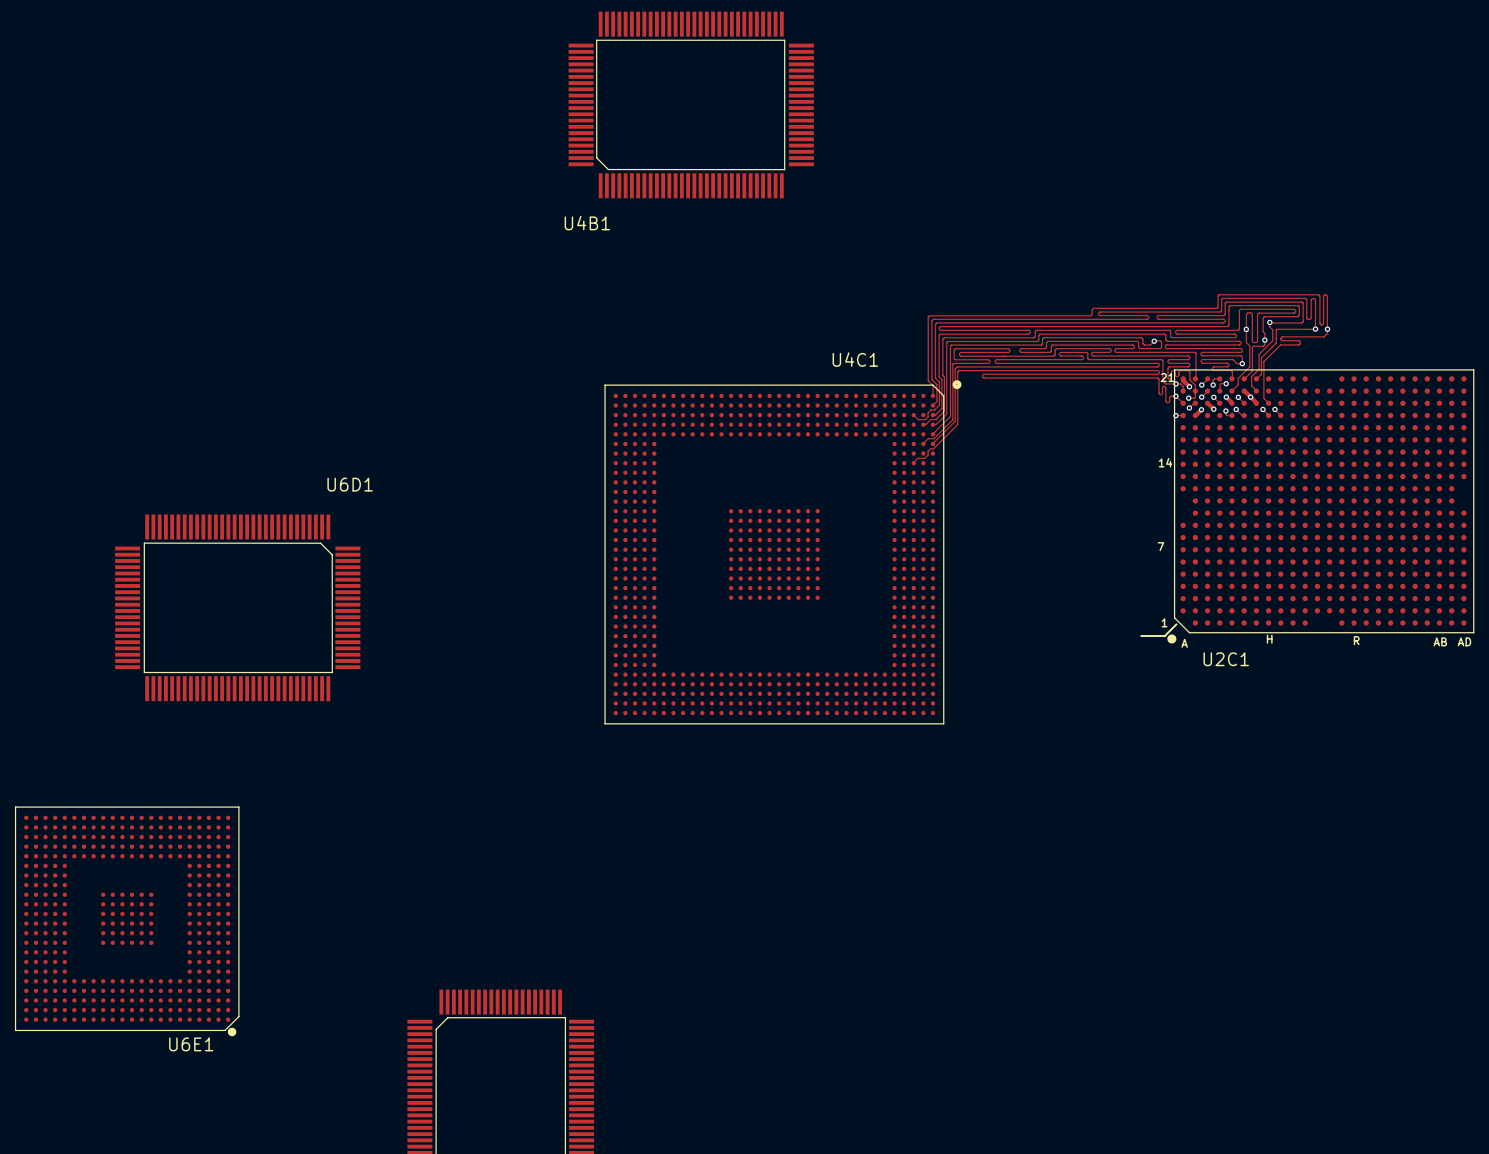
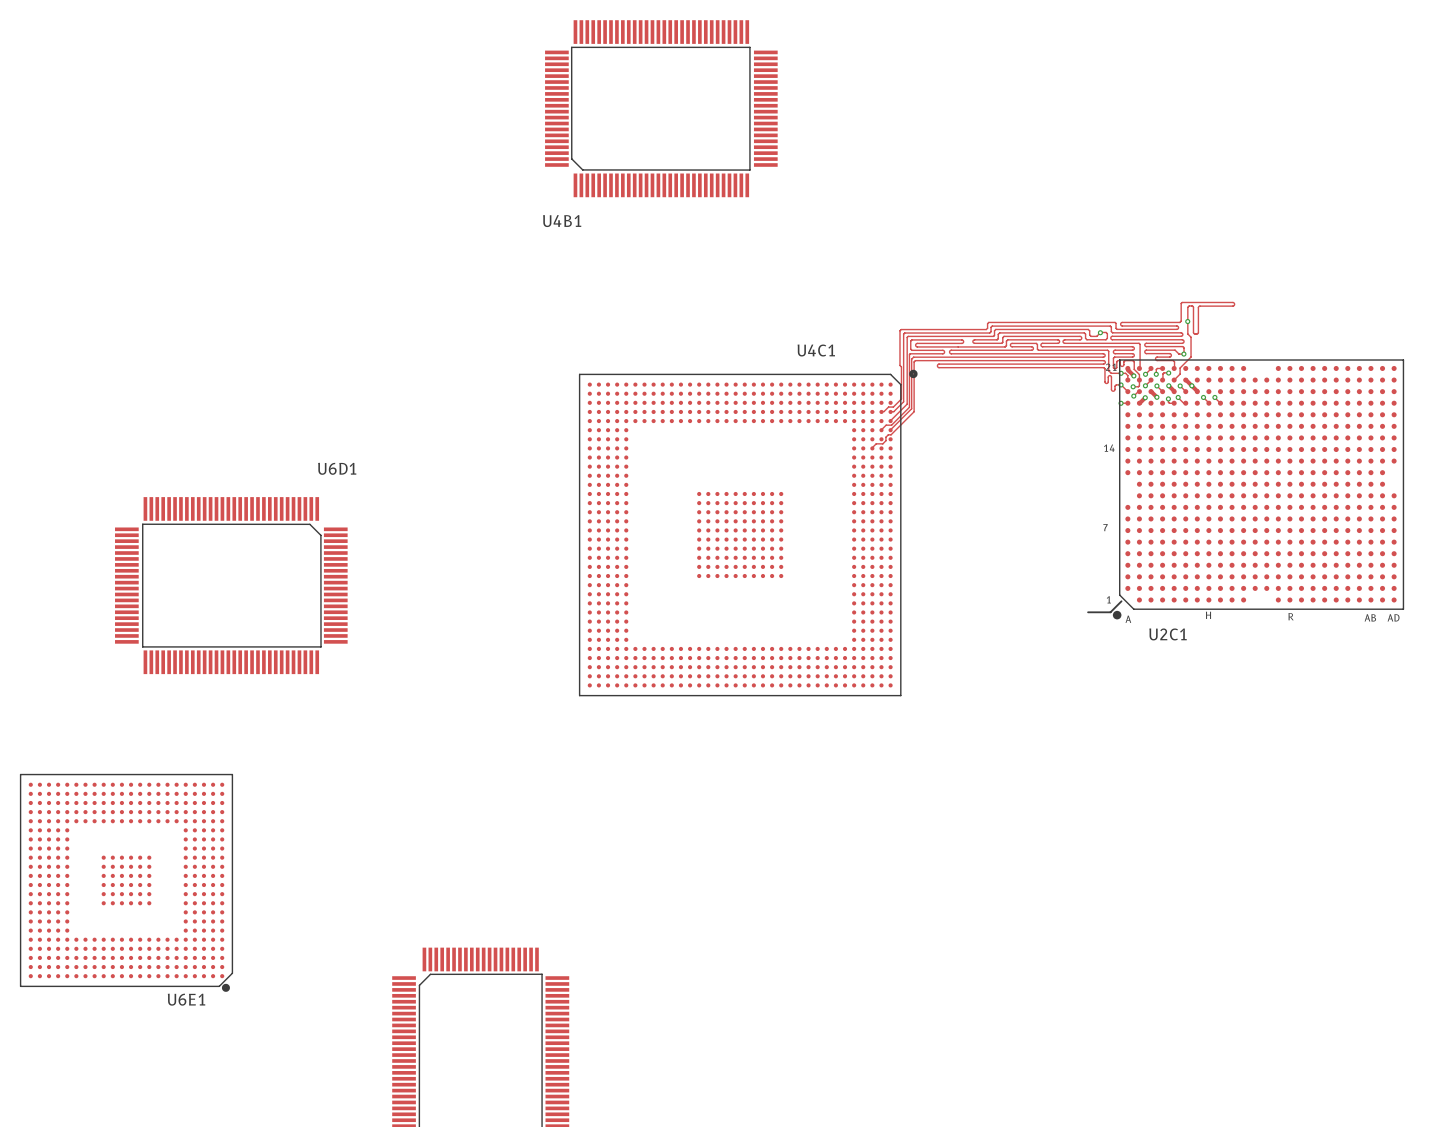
top track: (1269, 322) (1301, 323) (1303, 303) (1226, 302) (1224, 315) (1158, 315) (1156, 317) (1158, 319) (1223, 319) (1225, 321) (1223, 322) (936, 322) (935, 378) (939, 382) (939, 405) (928, 412) (925, 419) (918, 419) (913, 415) -> none
top track: (1269, 322) (1269, 326) (1272, 329) (1272, 340) (1259, 354) (1259, 369) (1251, 376) (1251, 385) (1256, 391) -> none
via: (1269, 322) -> none
via: (1315, 329) -> none
via: (1327, 329) -> none
top track: (1028, 330) (1030, 332) (1028, 334) (940, 334) (939, 376) (941, 379) (941, 408) (932, 415) -> none
top track: (1028, 330) (941, 330) (939, 328) (941, 326) (1227, 326) (1230, 305) (1299, 306) (1297, 316) (1264, 316) (1263, 331) (1264, 340) -> none
top track: (1264, 340) (1263, 346) (1252, 347) (1252, 371) (1244, 378) -> none
via: (1264, 340) -> none
top track: (1256, 378) (1261, 374) (1261, 357) (1276, 343) (1277, 329) (1315, 329) (1314, 298) (1311, 299) (1309, 319) (1306, 317) (1305, 298) (1222, 298) (1220, 311) (1100, 311) (1098, 313) (1100, 315) (1147, 315) (1148, 317) (1147, 319) (933, 319) (931, 379) (936, 384) (936, 401) (932, 405) -> none
top track: (932, 395) (932, 385) (928, 380) (929, 315) (1090, 315) (1093, 308) (1216, 308) (1219, 294) (1318, 294) (1319, 323) (1321, 324) (1323, 323) (1323, 296) (1326, 295) (1327, 333) (1324, 336) (1282, 337) (1282, 340) (1298, 340) (1300, 343) (1280, 344) (1263, 361) (1263, 398) (1268, 403) -> none

